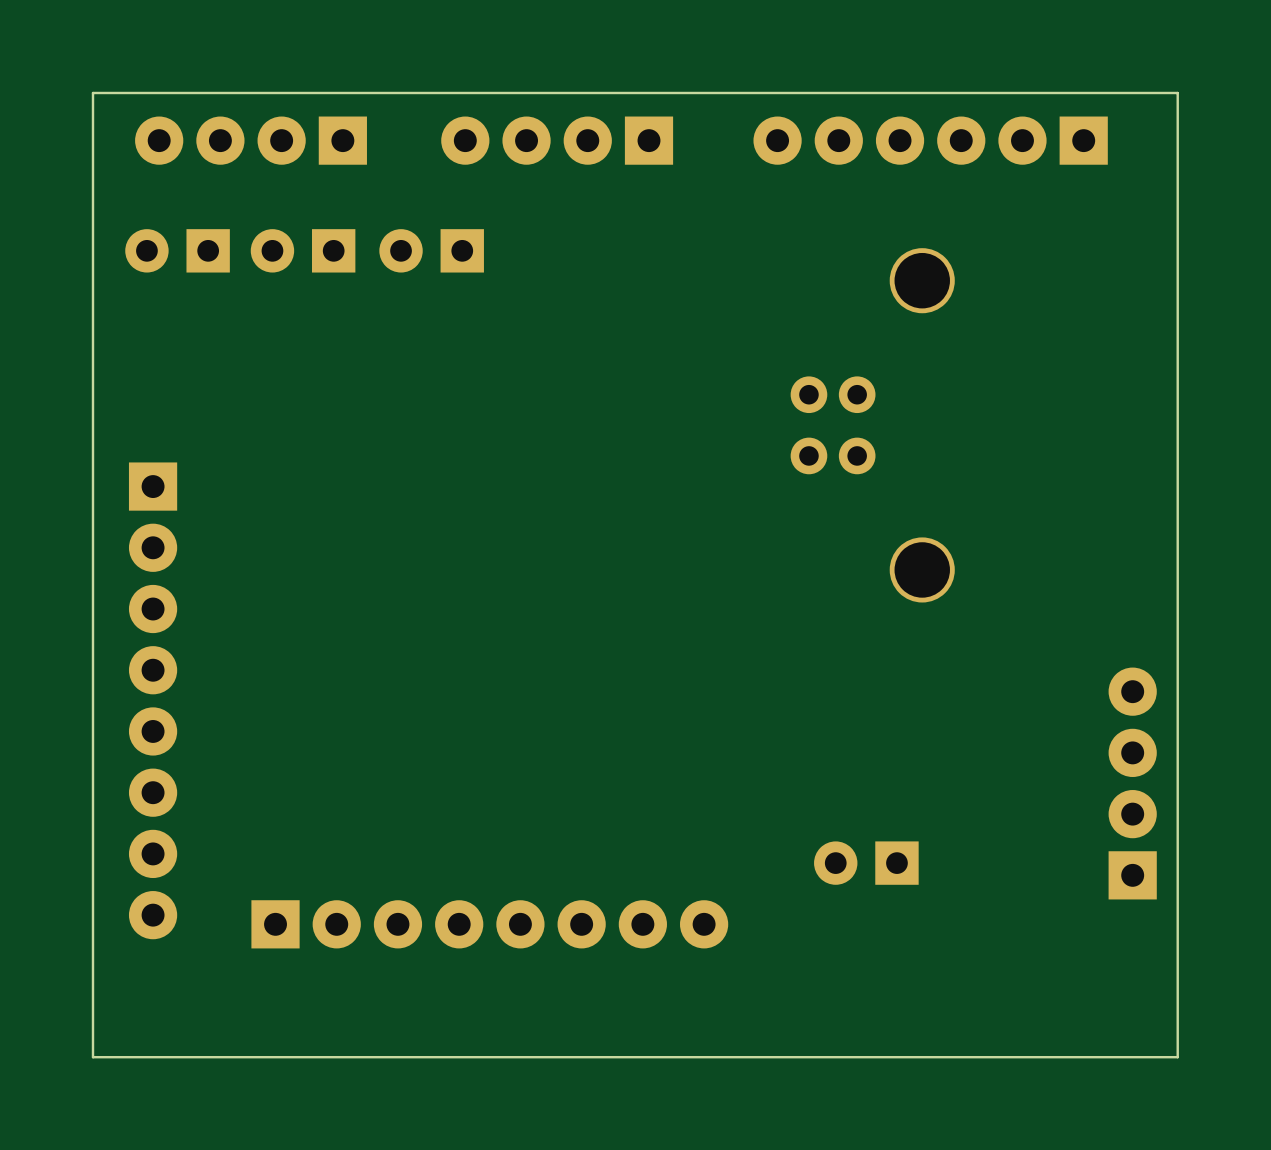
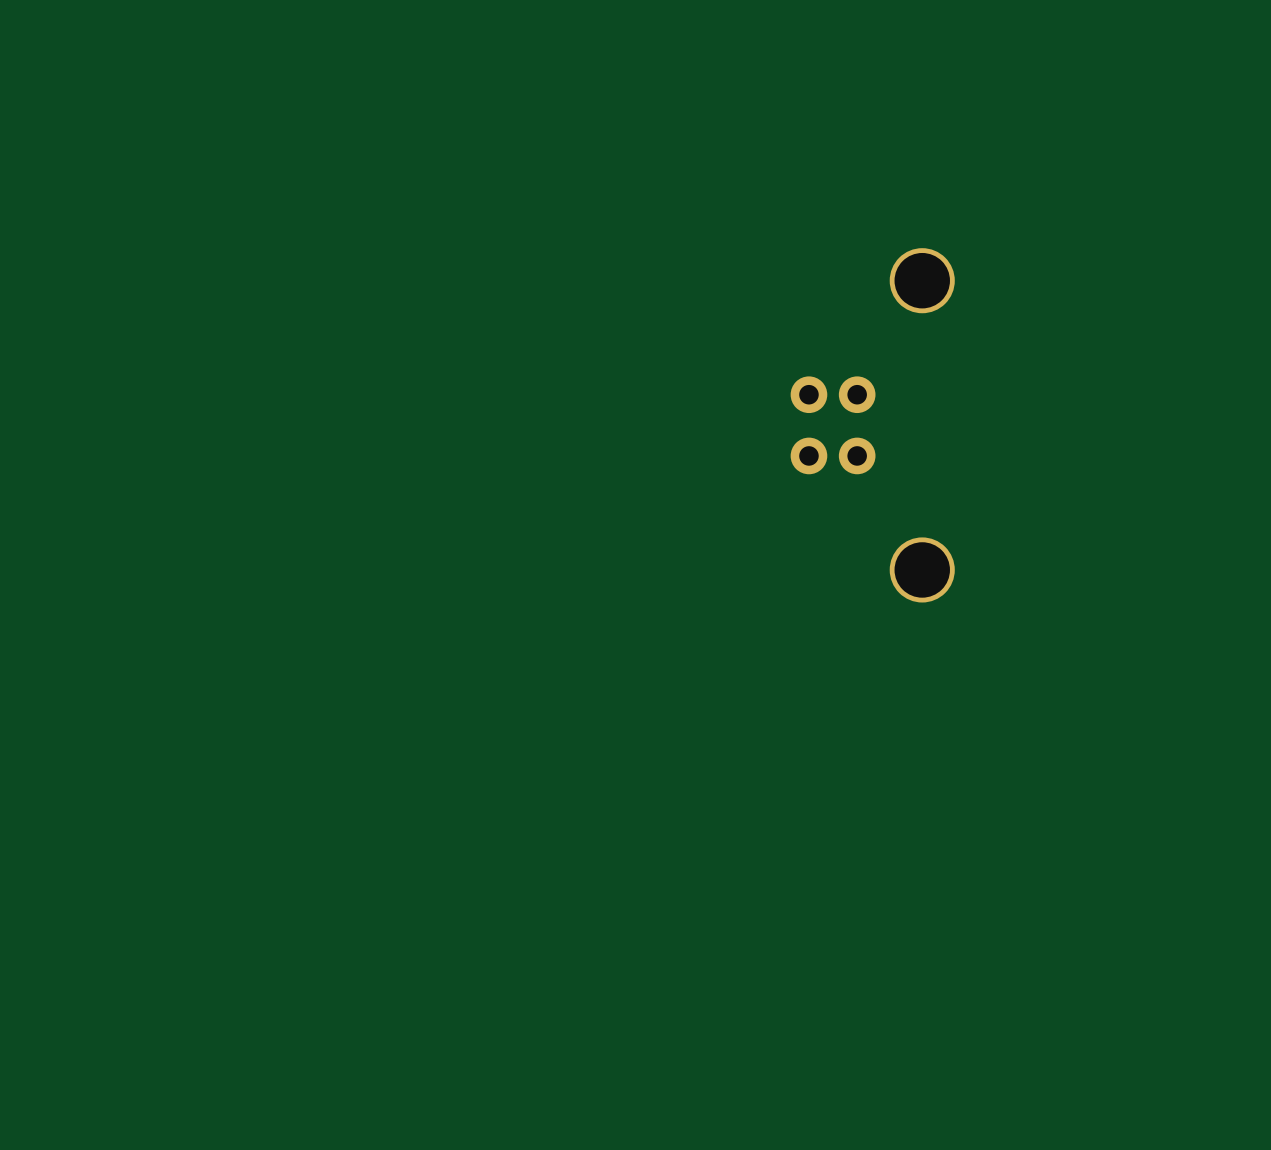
board edge: (1177, 92) (92, 92) (92, 1057) (1177, 1057) (1177, 92) -> none
part: (251, 140) -> none
part: (557, 140) -> none
part: (930, 140) -> none
part: (177, 250) -> none
part: (303, 250) -> none
part: (431, 250) -> none
part: (153, 700) -> none
part: (1132, 783) -> none
part: (866, 863) -> none
part: (489, 924) -> none

